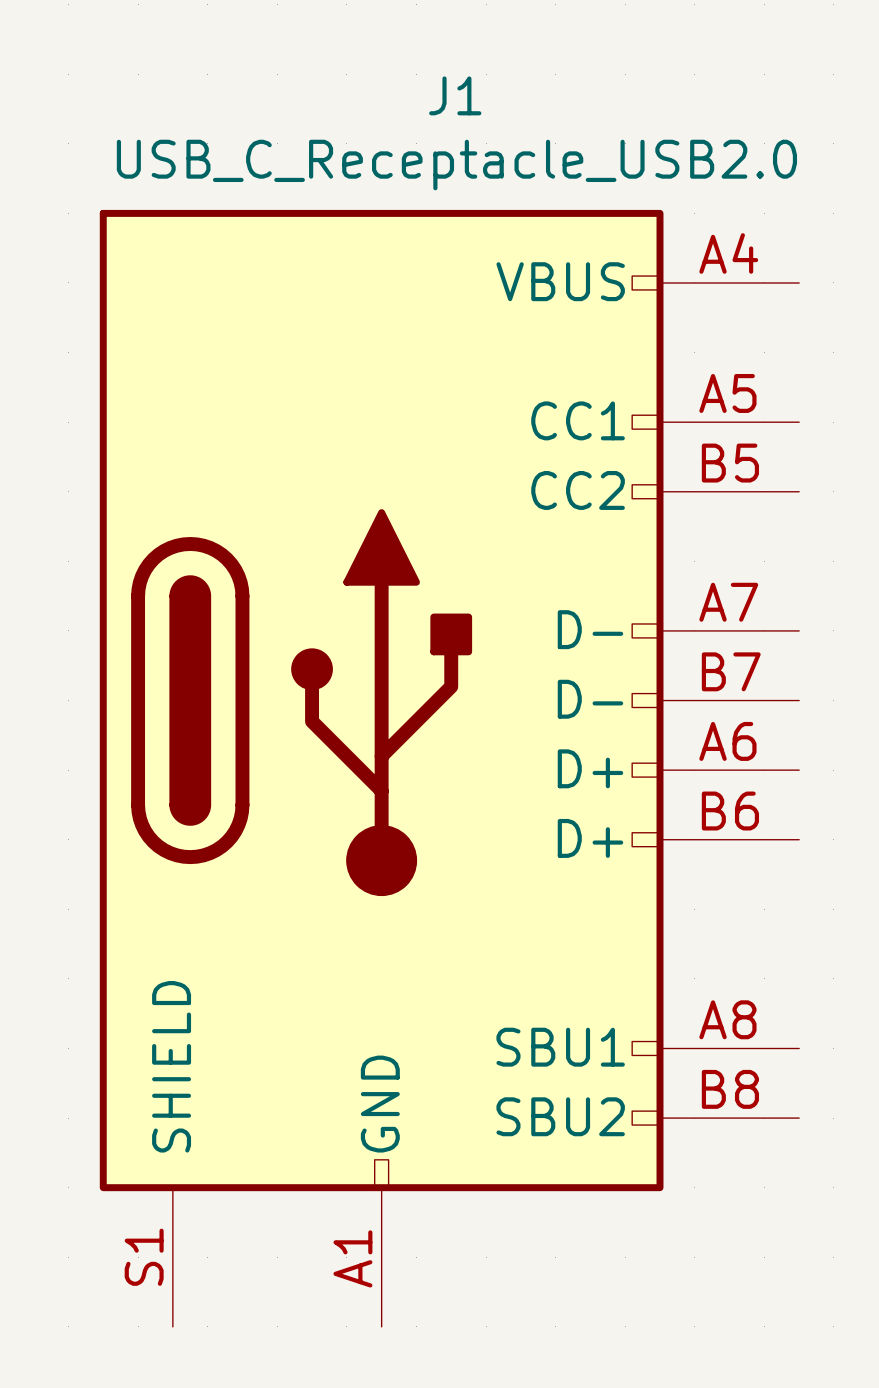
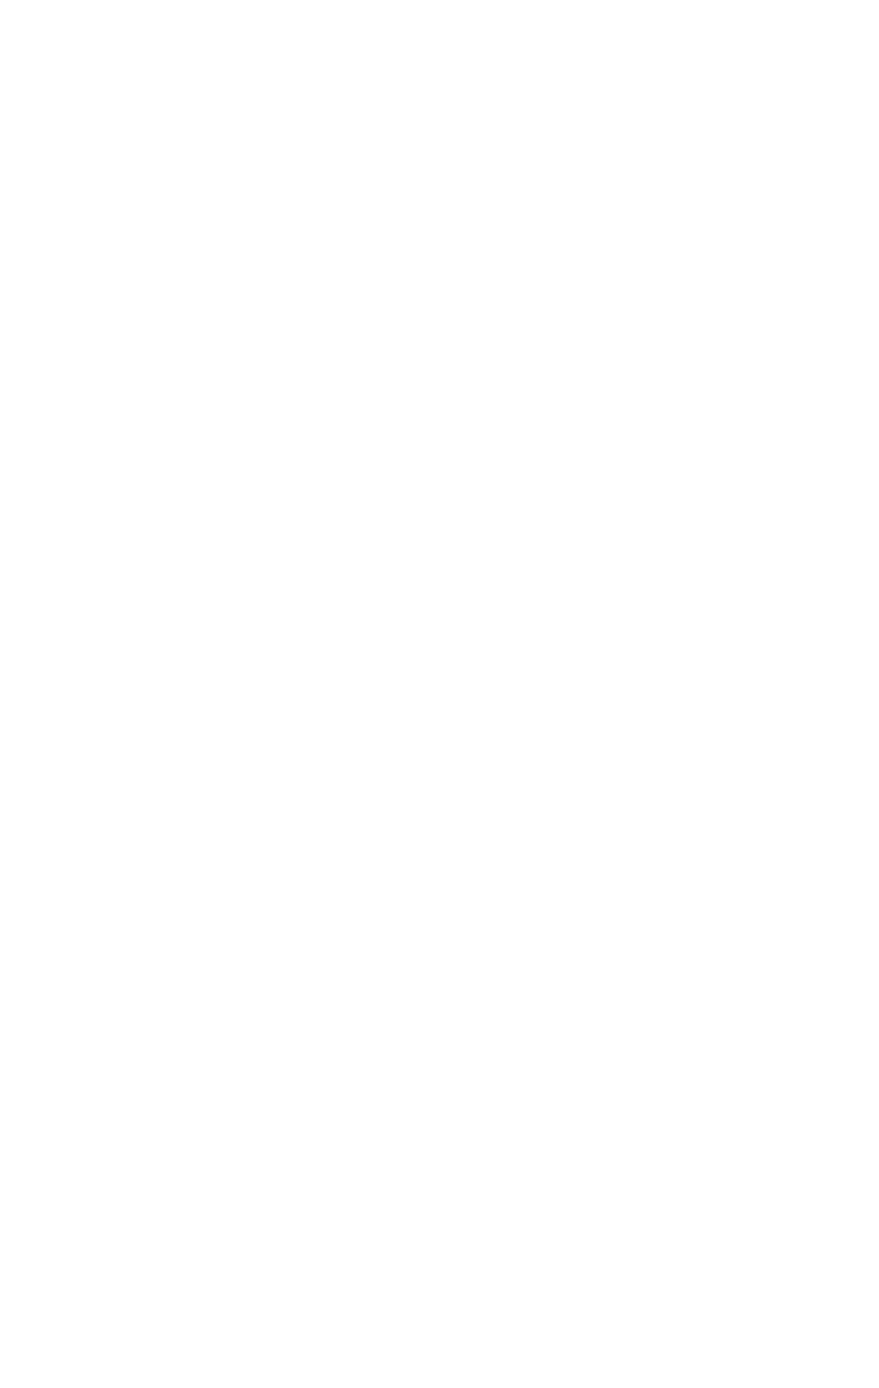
J1: USB_C_Receptacle_USB2.0 (449, 768) -> none

